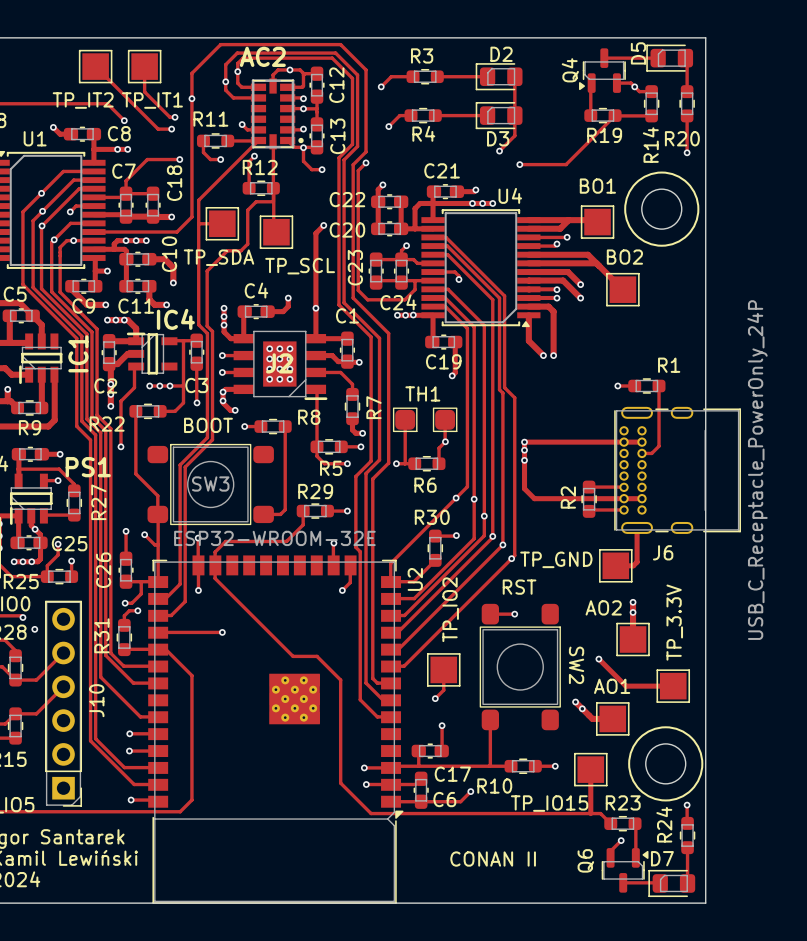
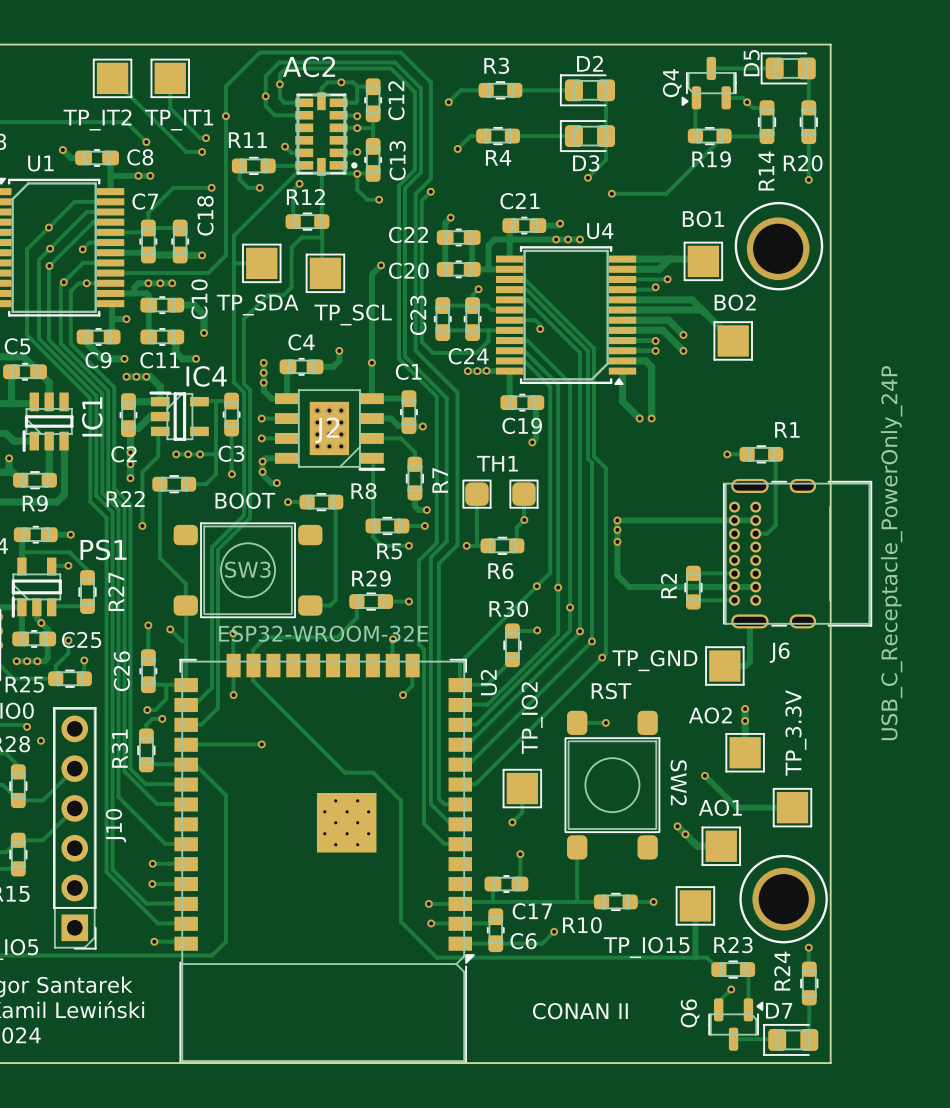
round board edge: [641, 188, 683, 230] -> none
via: none -> (778, 248)
round board edge: [645, 743, 687, 785] -> none
via: none -> (783, 899)

